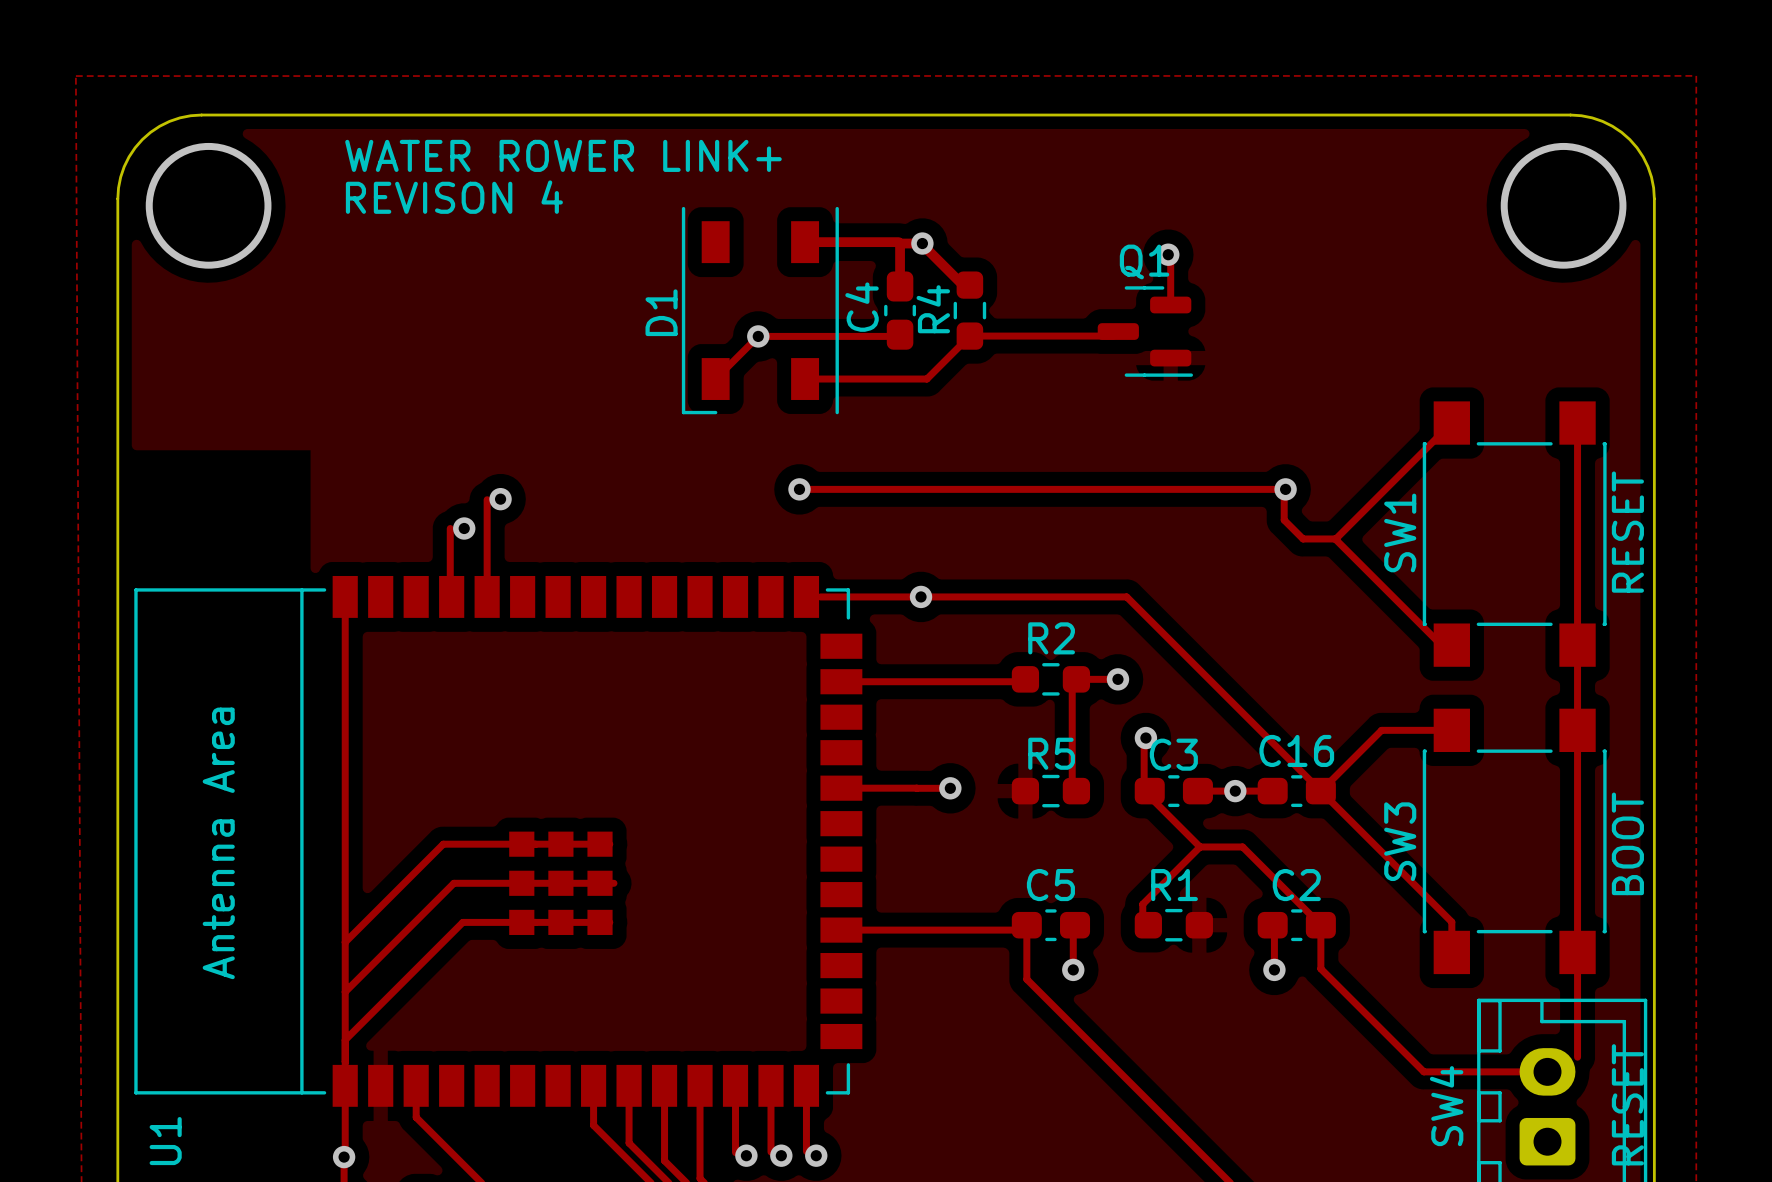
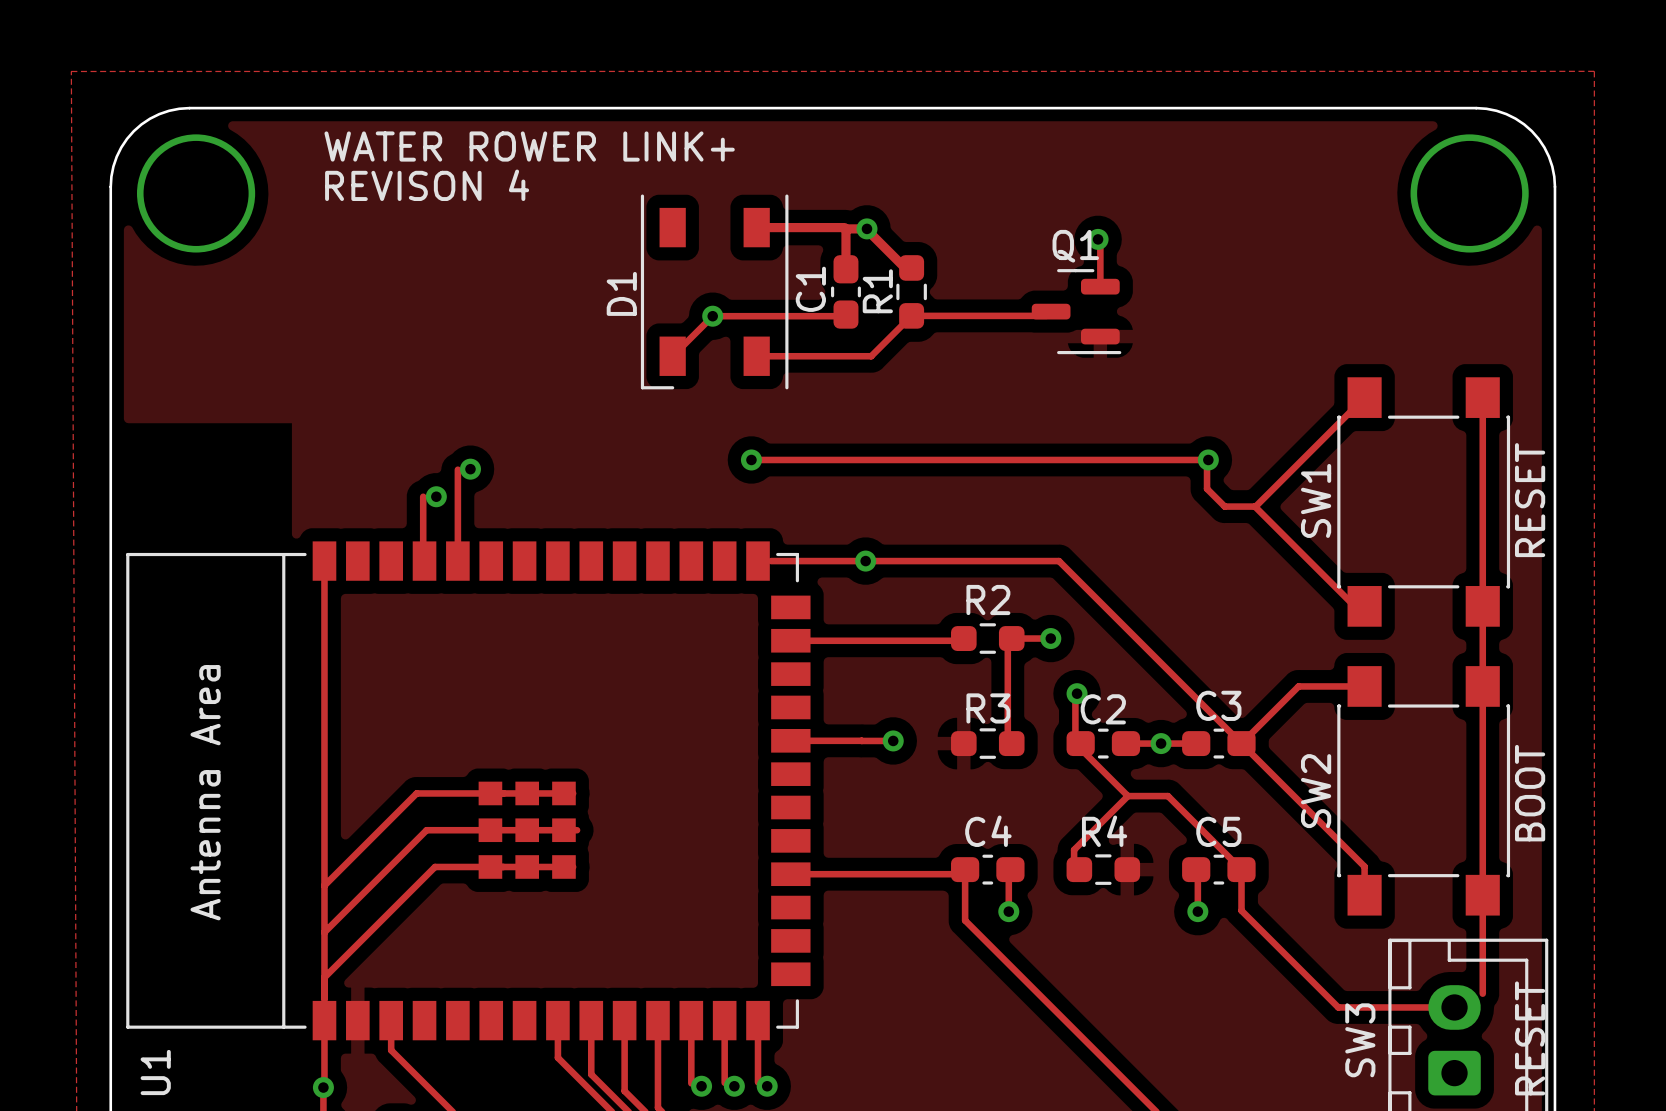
C4 name: C4 (862, 307) -> C1 (810, 289)
R4 name: R4 (933, 309) -> R1 (877, 291)
C16 name: C16 (1296, 750) -> C3 (1218, 705)
R5 name: R5 (1051, 753) -> R3 (988, 708)
C3 name: C3 (1173, 754) -> C2 (1103, 709)
SW3 name: SW3 (1400, 841) -> SW2 (1316, 791)
C5 name: C5 (1050, 885) -> C4 (988, 831)
R1 name: R1 (1174, 885) -> R4 (1104, 831)
C2 name: C2 (1296, 885) -> C5 (1218, 831)
SW4 name: SW4 (1446, 1106) -> SW3 (1360, 1040)

